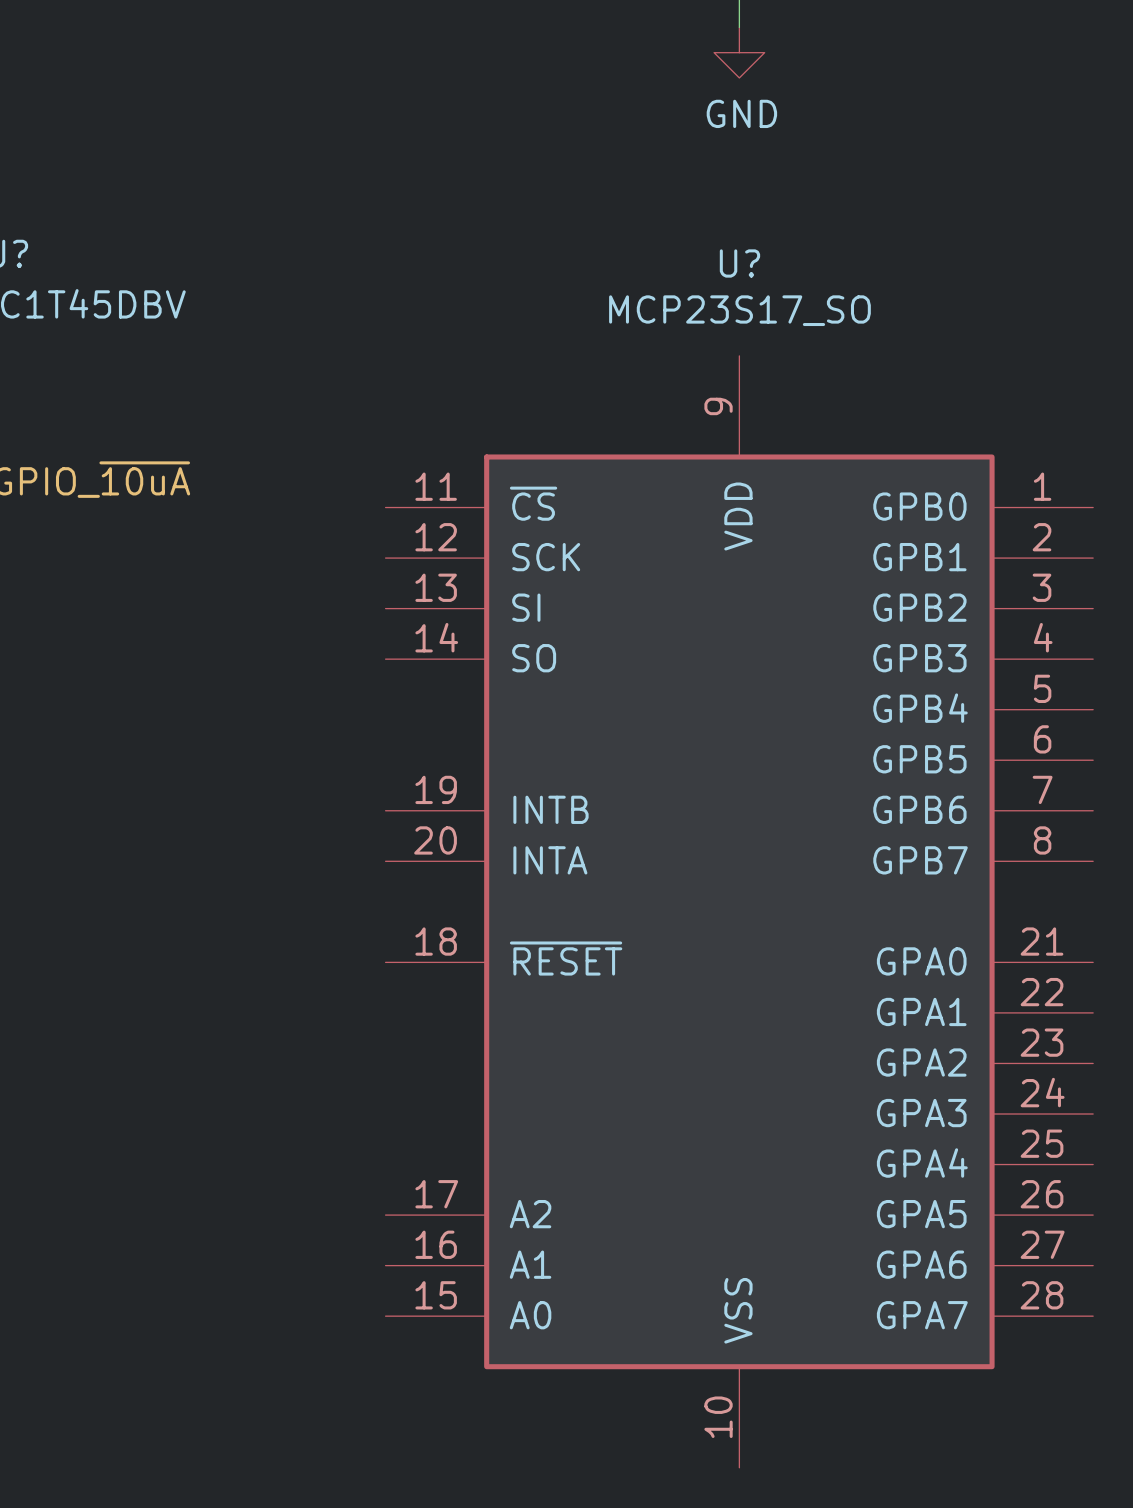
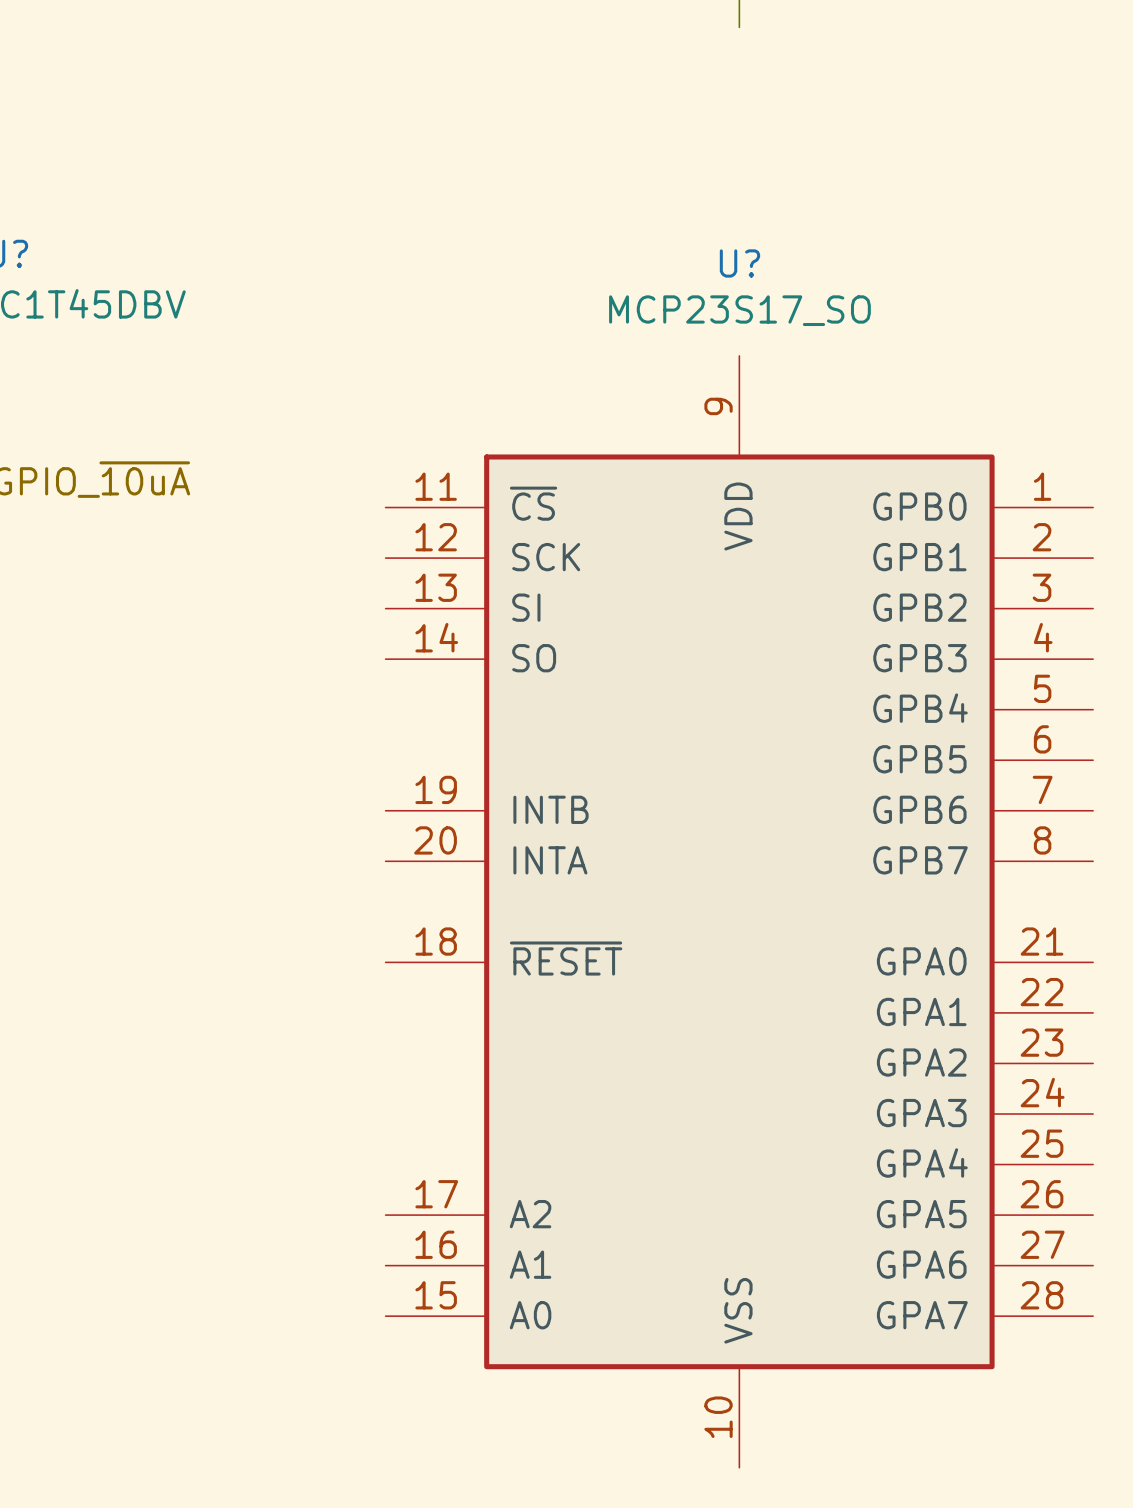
power symbol: GND (739, 52) -> none

